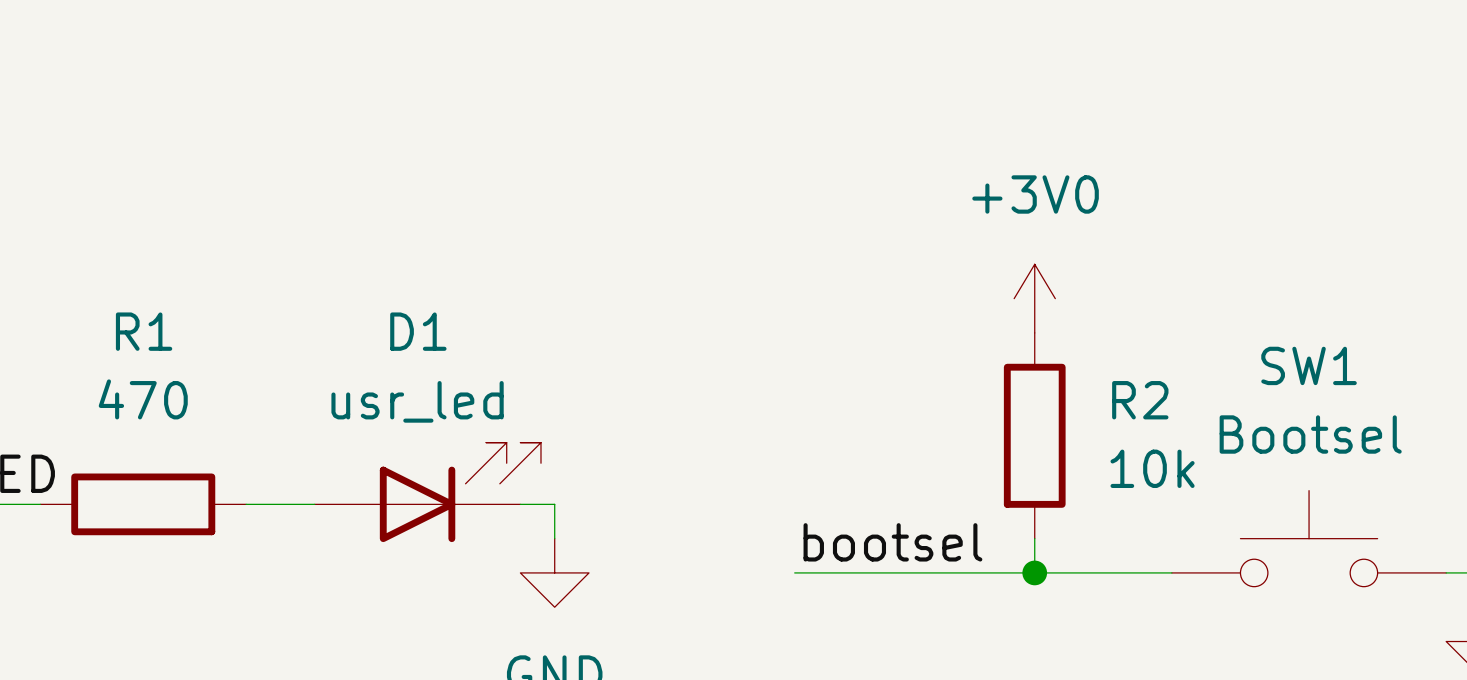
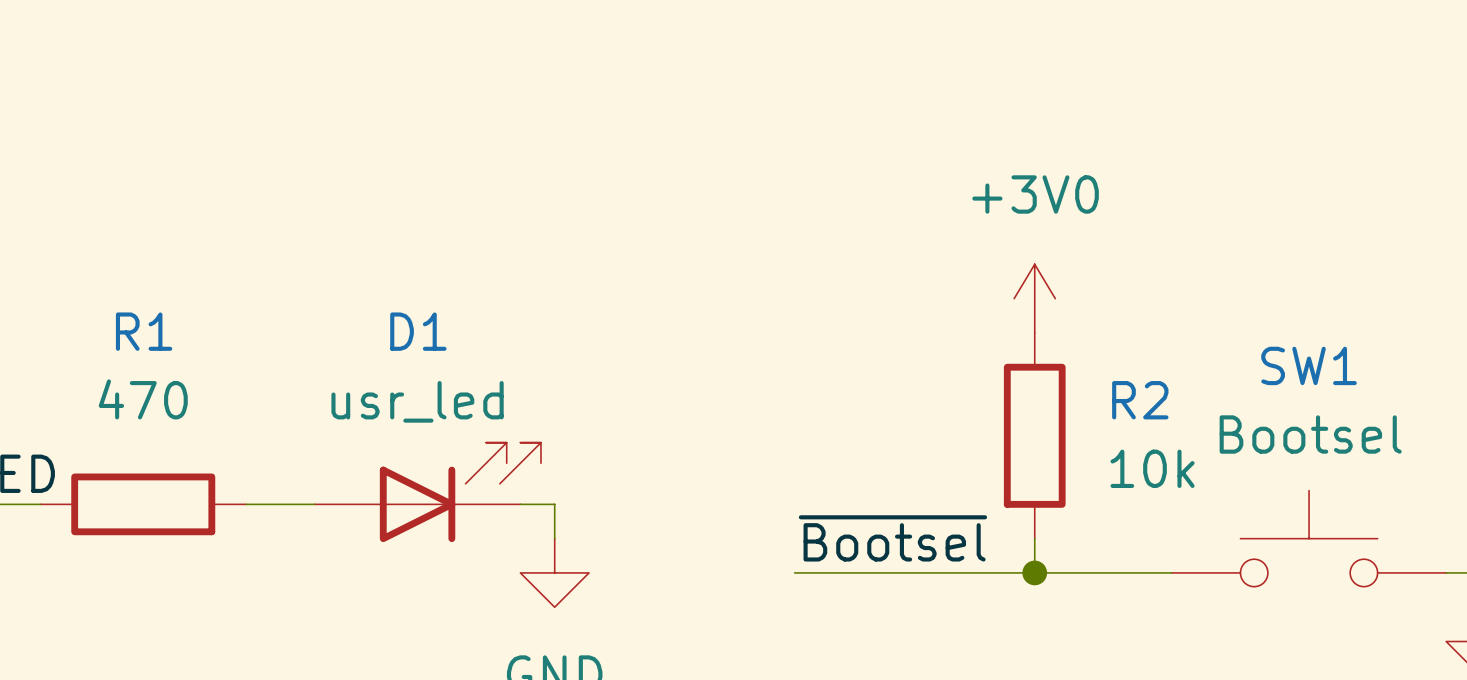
label: bootsel (892, 542) -> ~{Bootsel} (892, 538)

